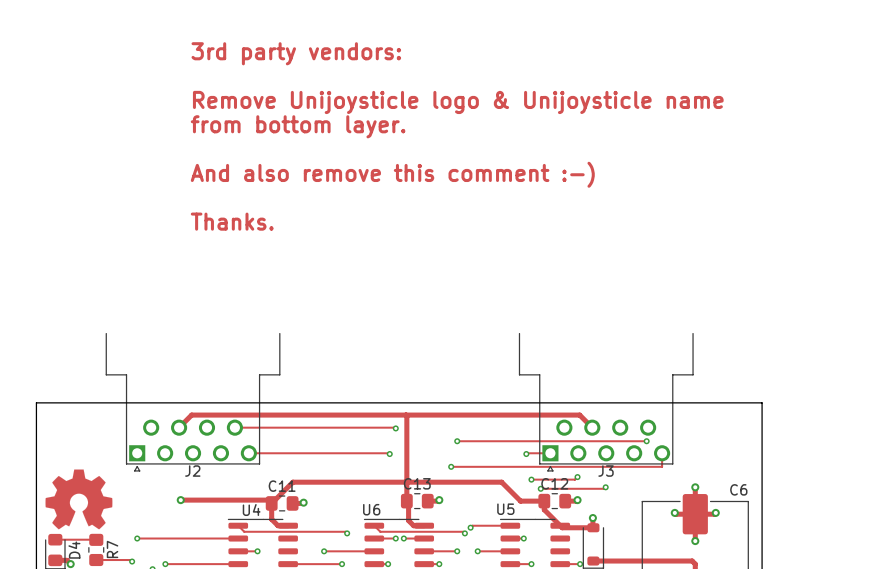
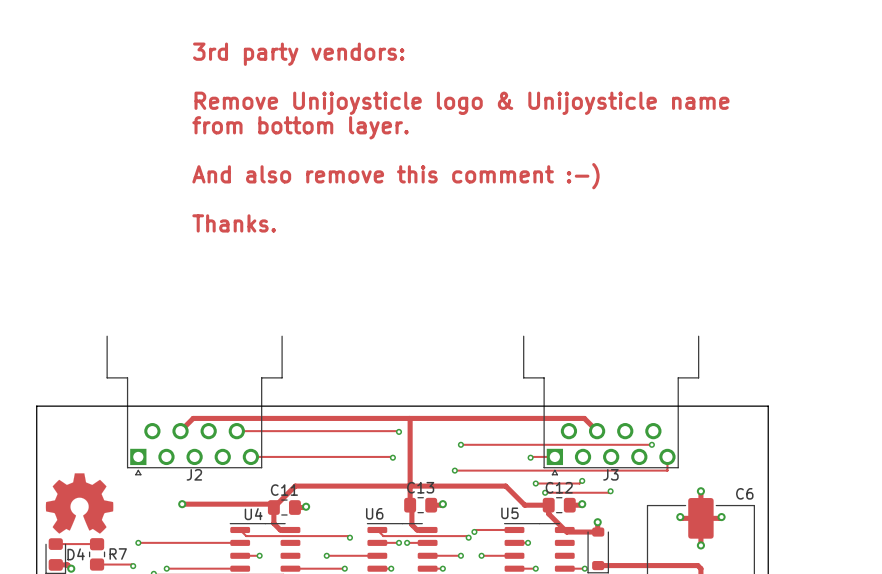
R7 name rotation: 0° (112, 549) -> 90° clockwise (118, 554)
D4 name rotation: 0° (74, 550) -> 90° clockwise (76, 554)

